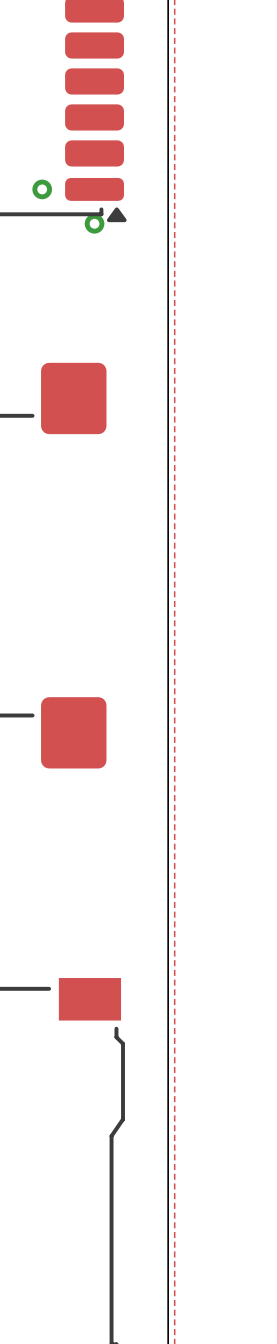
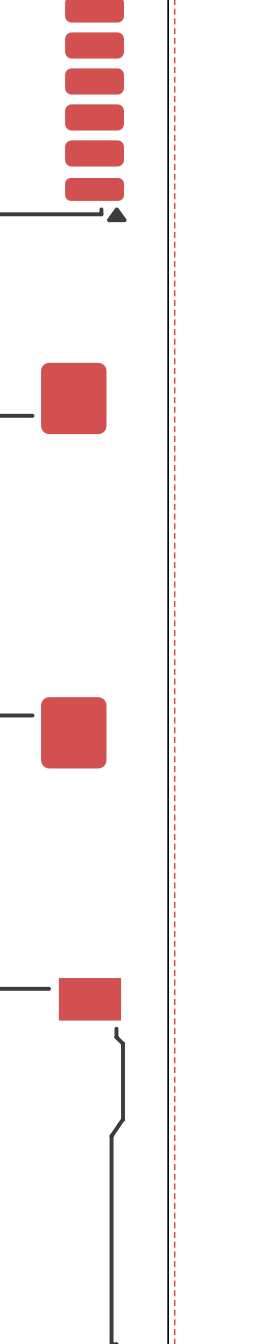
via: (42, 189) -> none
via: (94, 223) -> none

